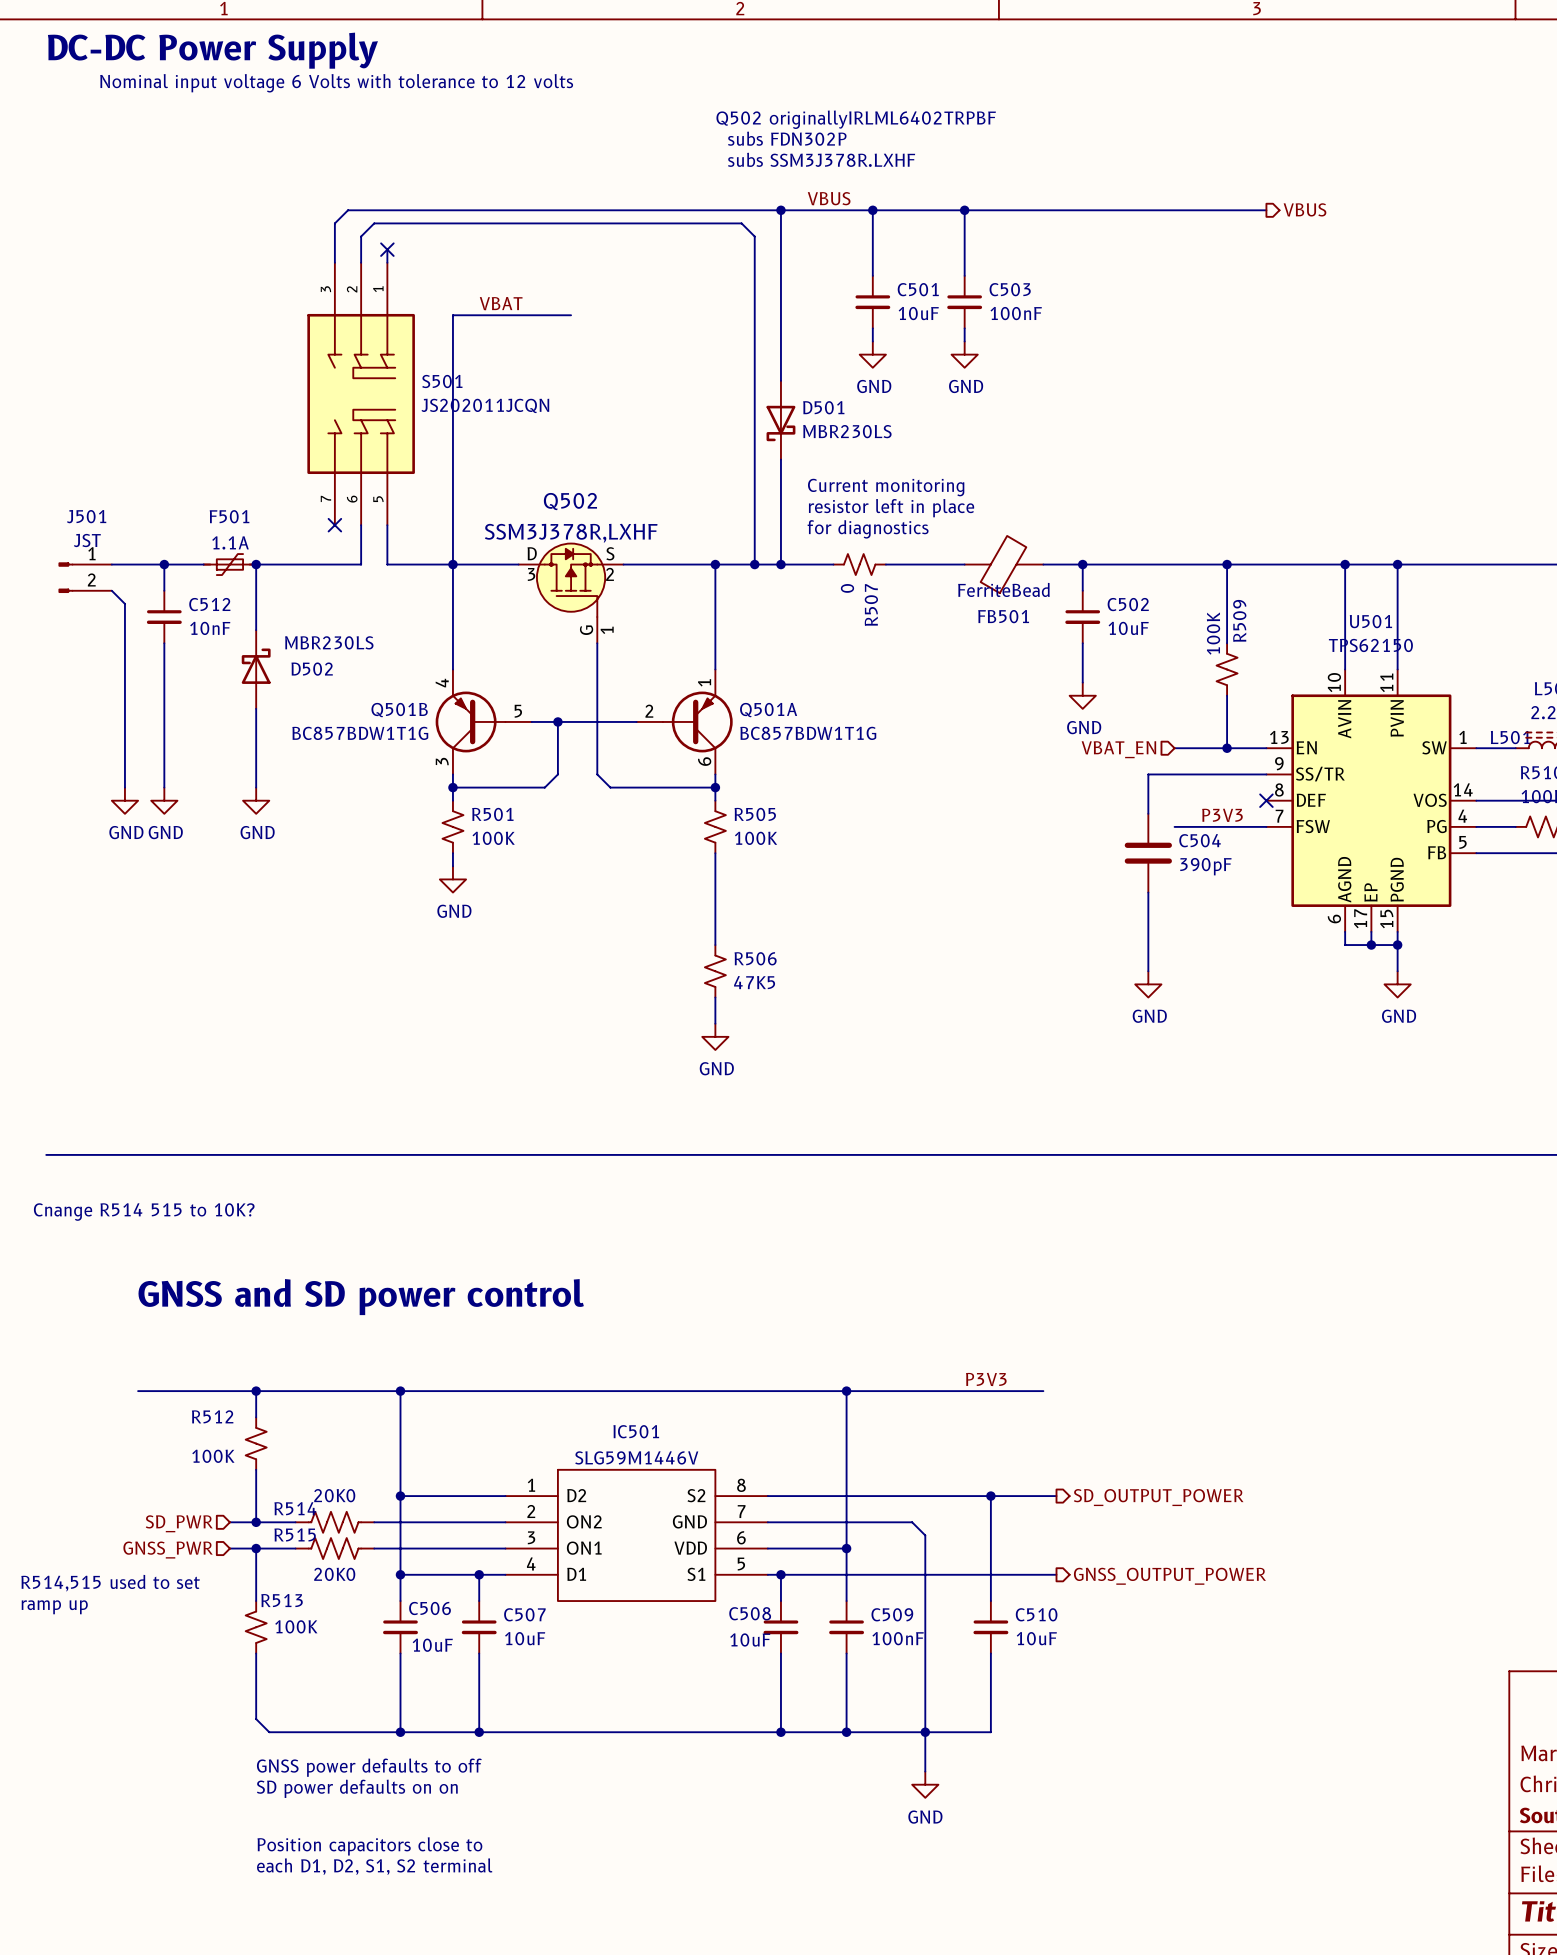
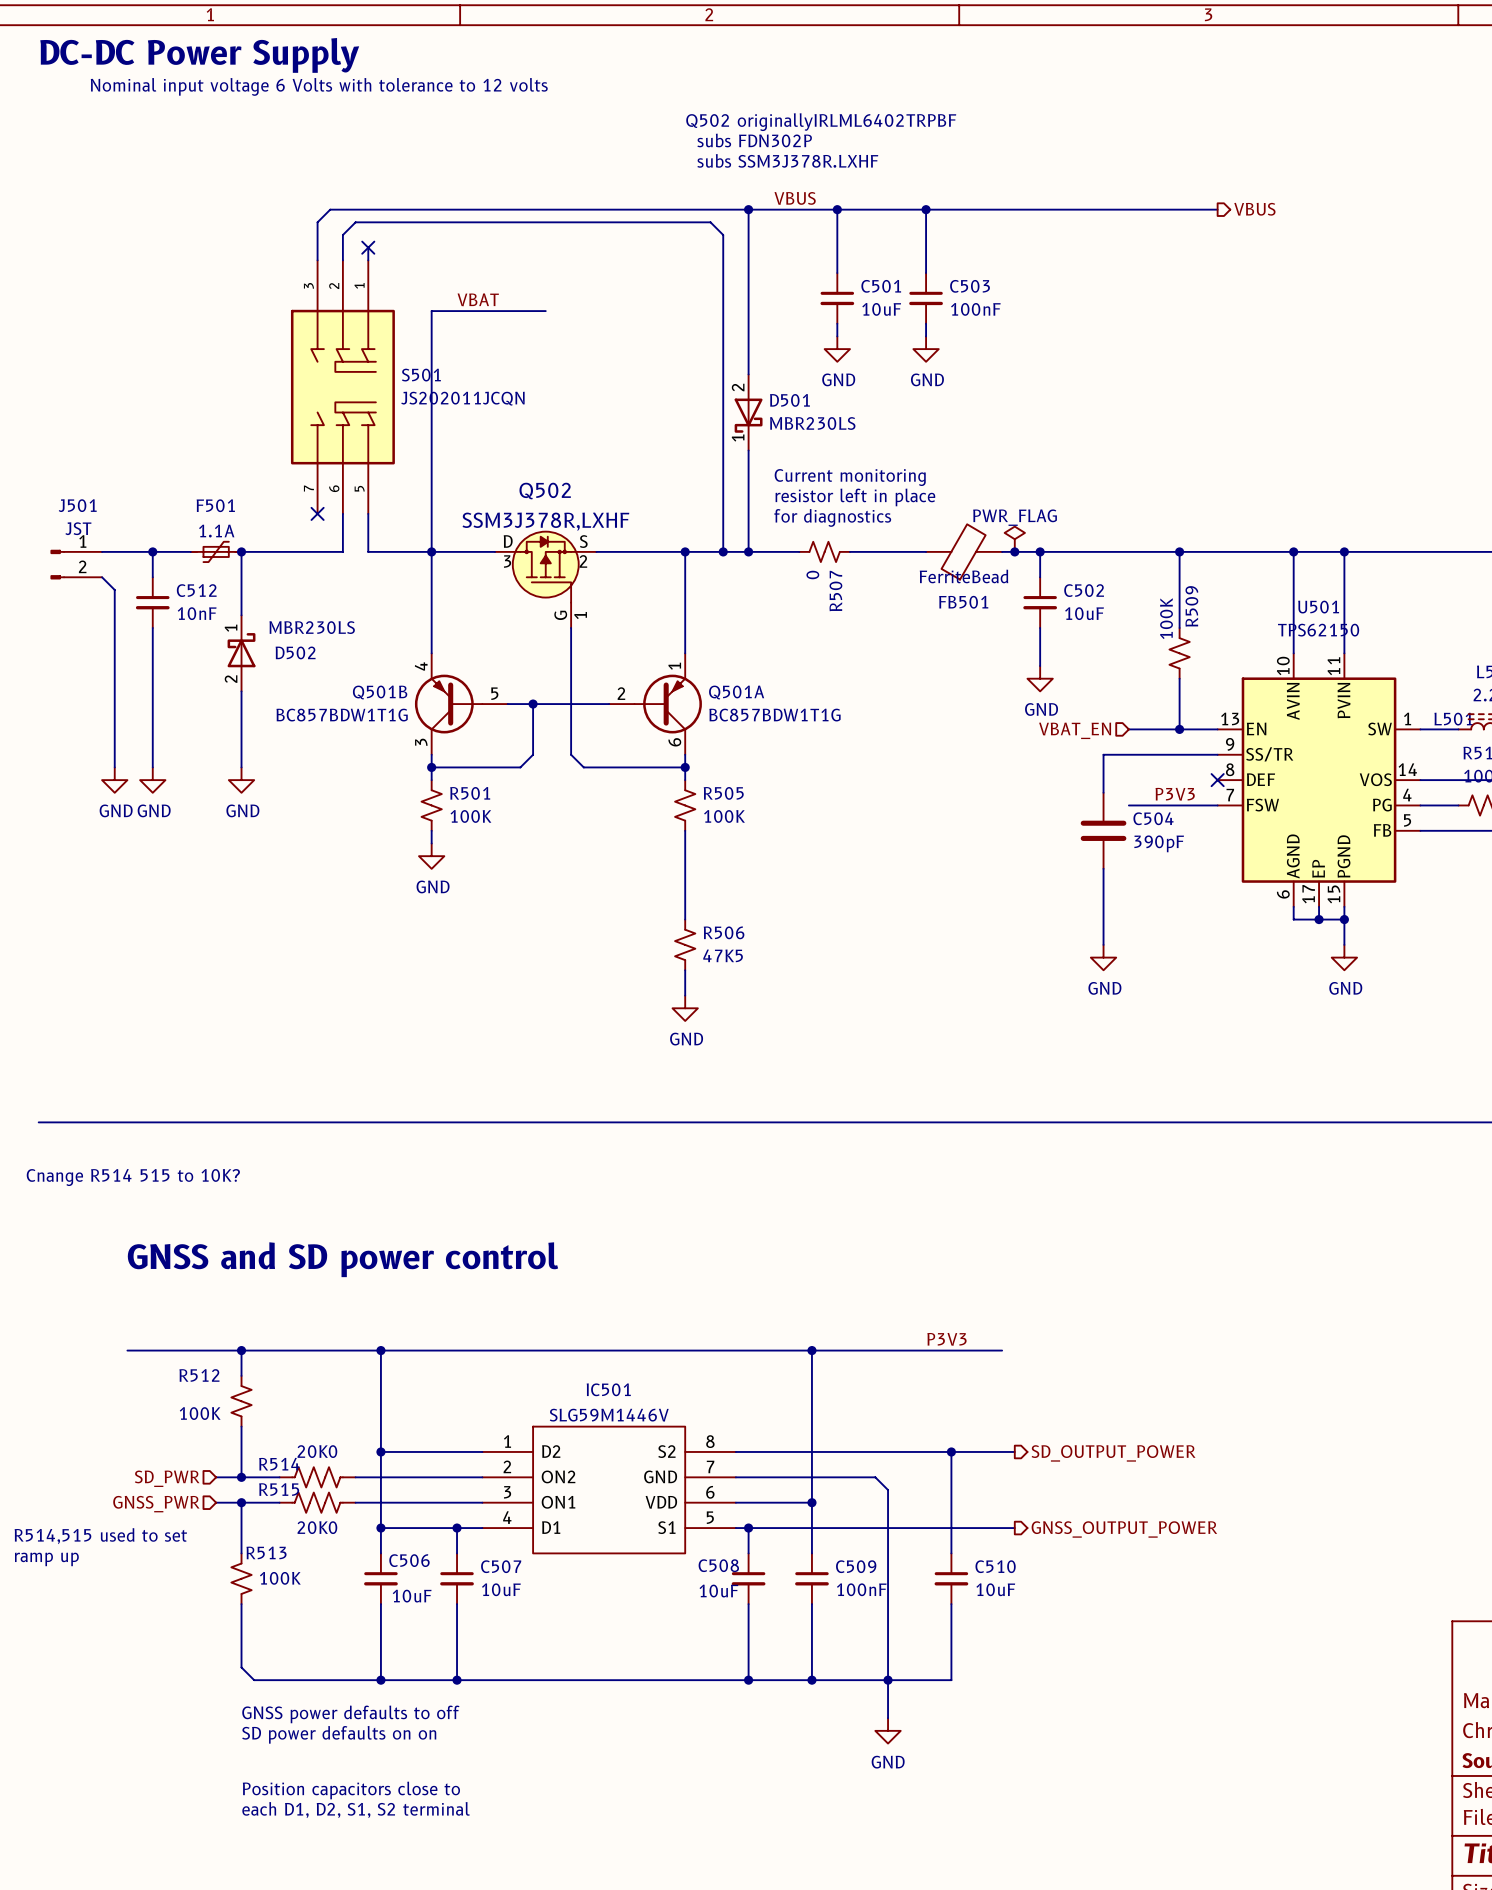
D501 pin number: none -> 2 (738, 387)
D501 pin number: none -> 1 (738, 438)
power symbol: none -> PWR_FLAG (1014, 539)
junction: none -> (1014, 551)
D502 pin number: none -> 1 (231, 628)
D502 pin number: none -> 2 (231, 679)

